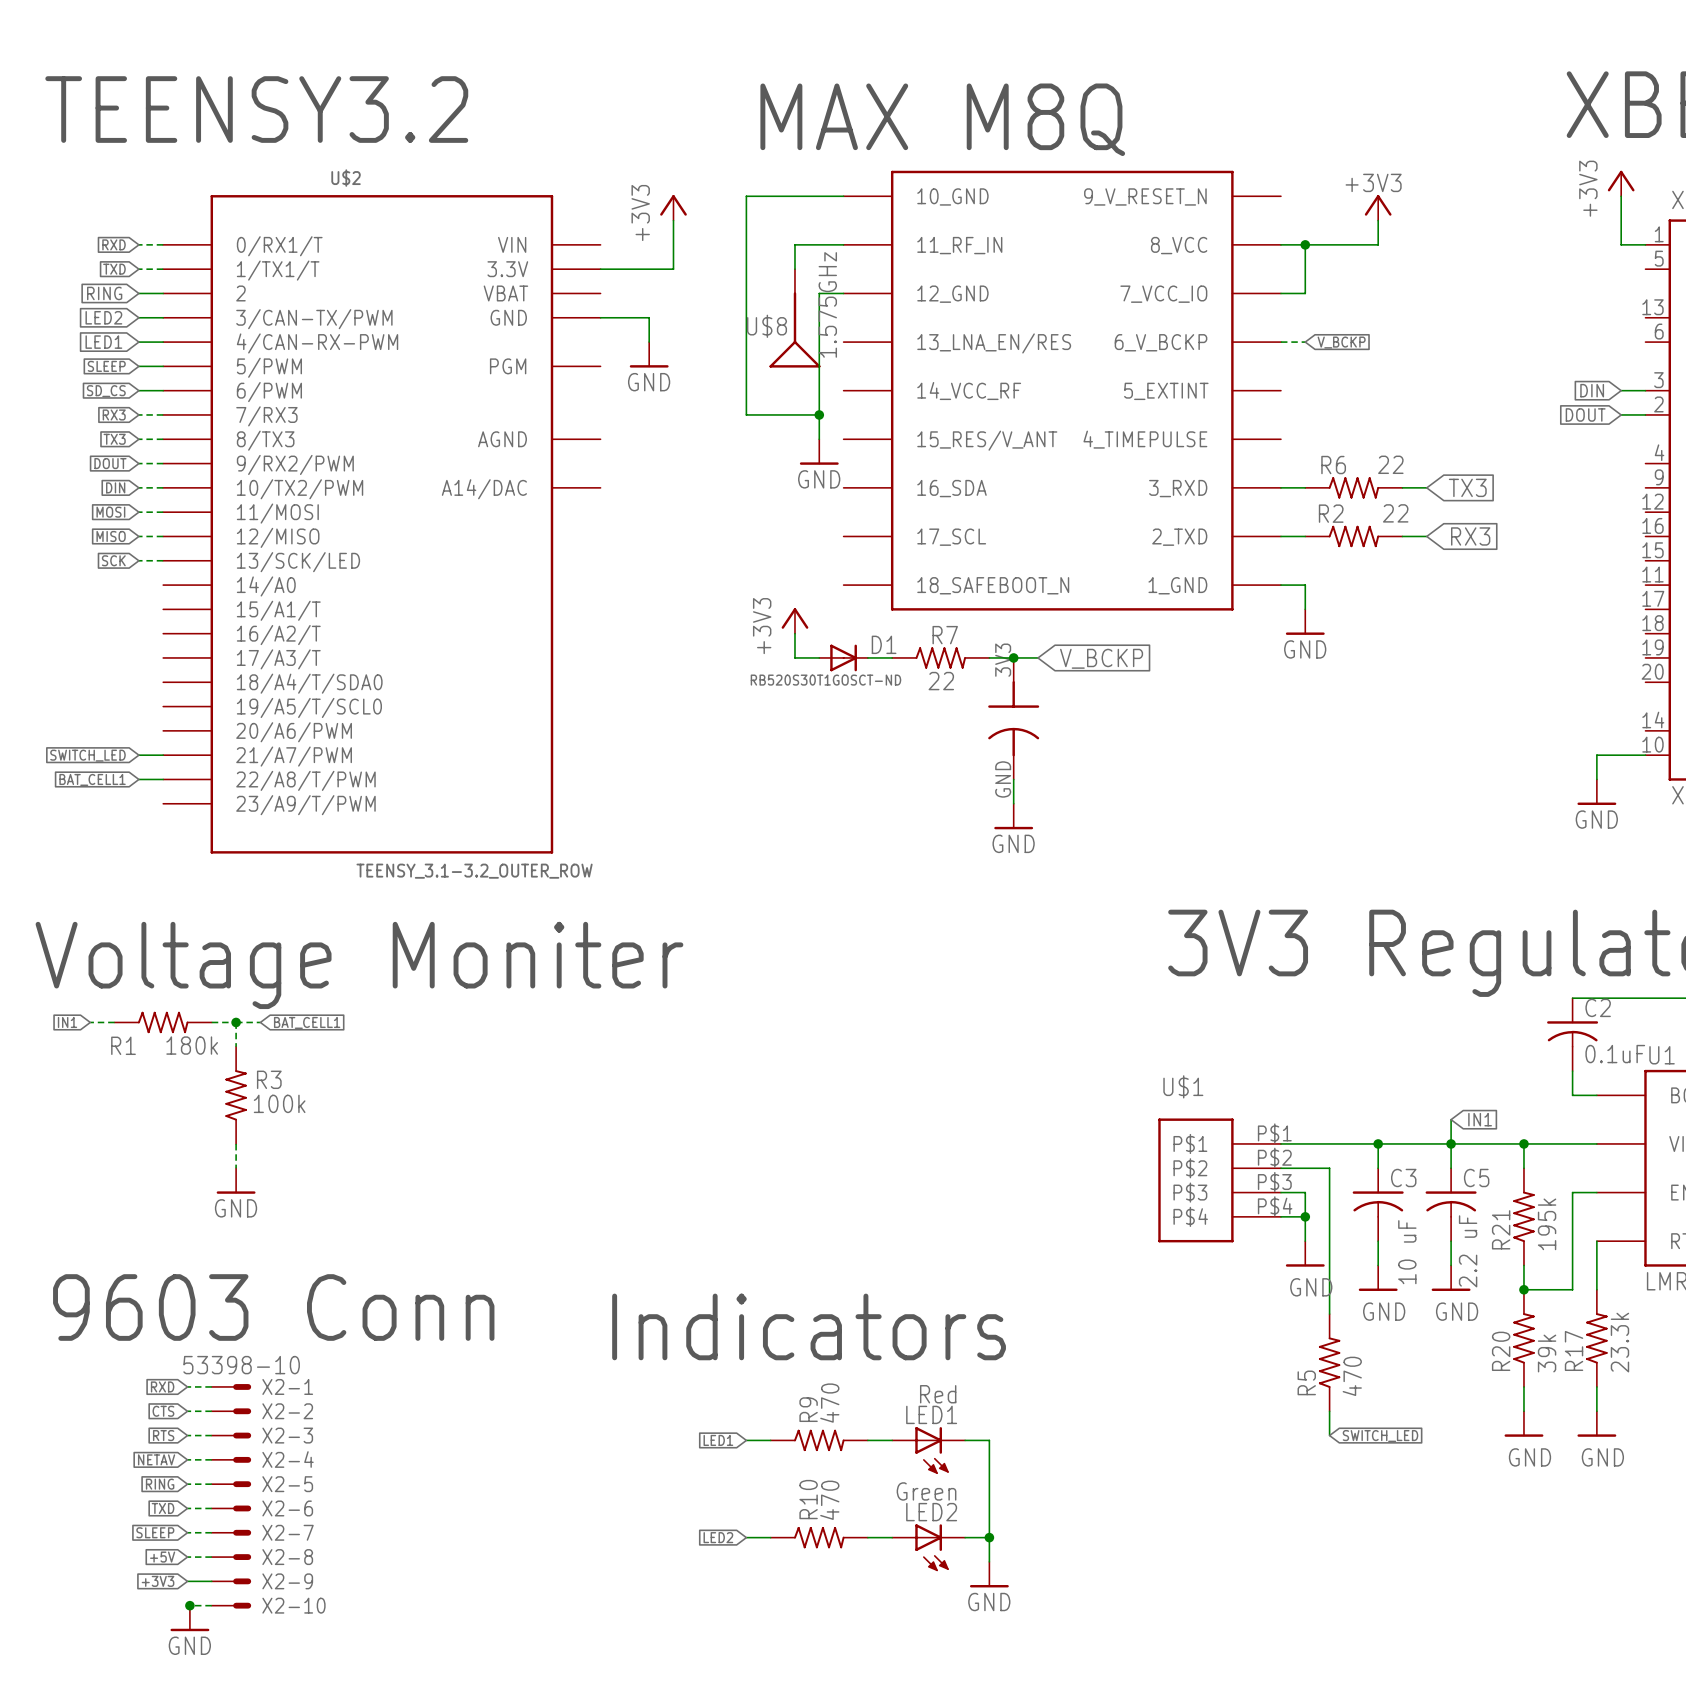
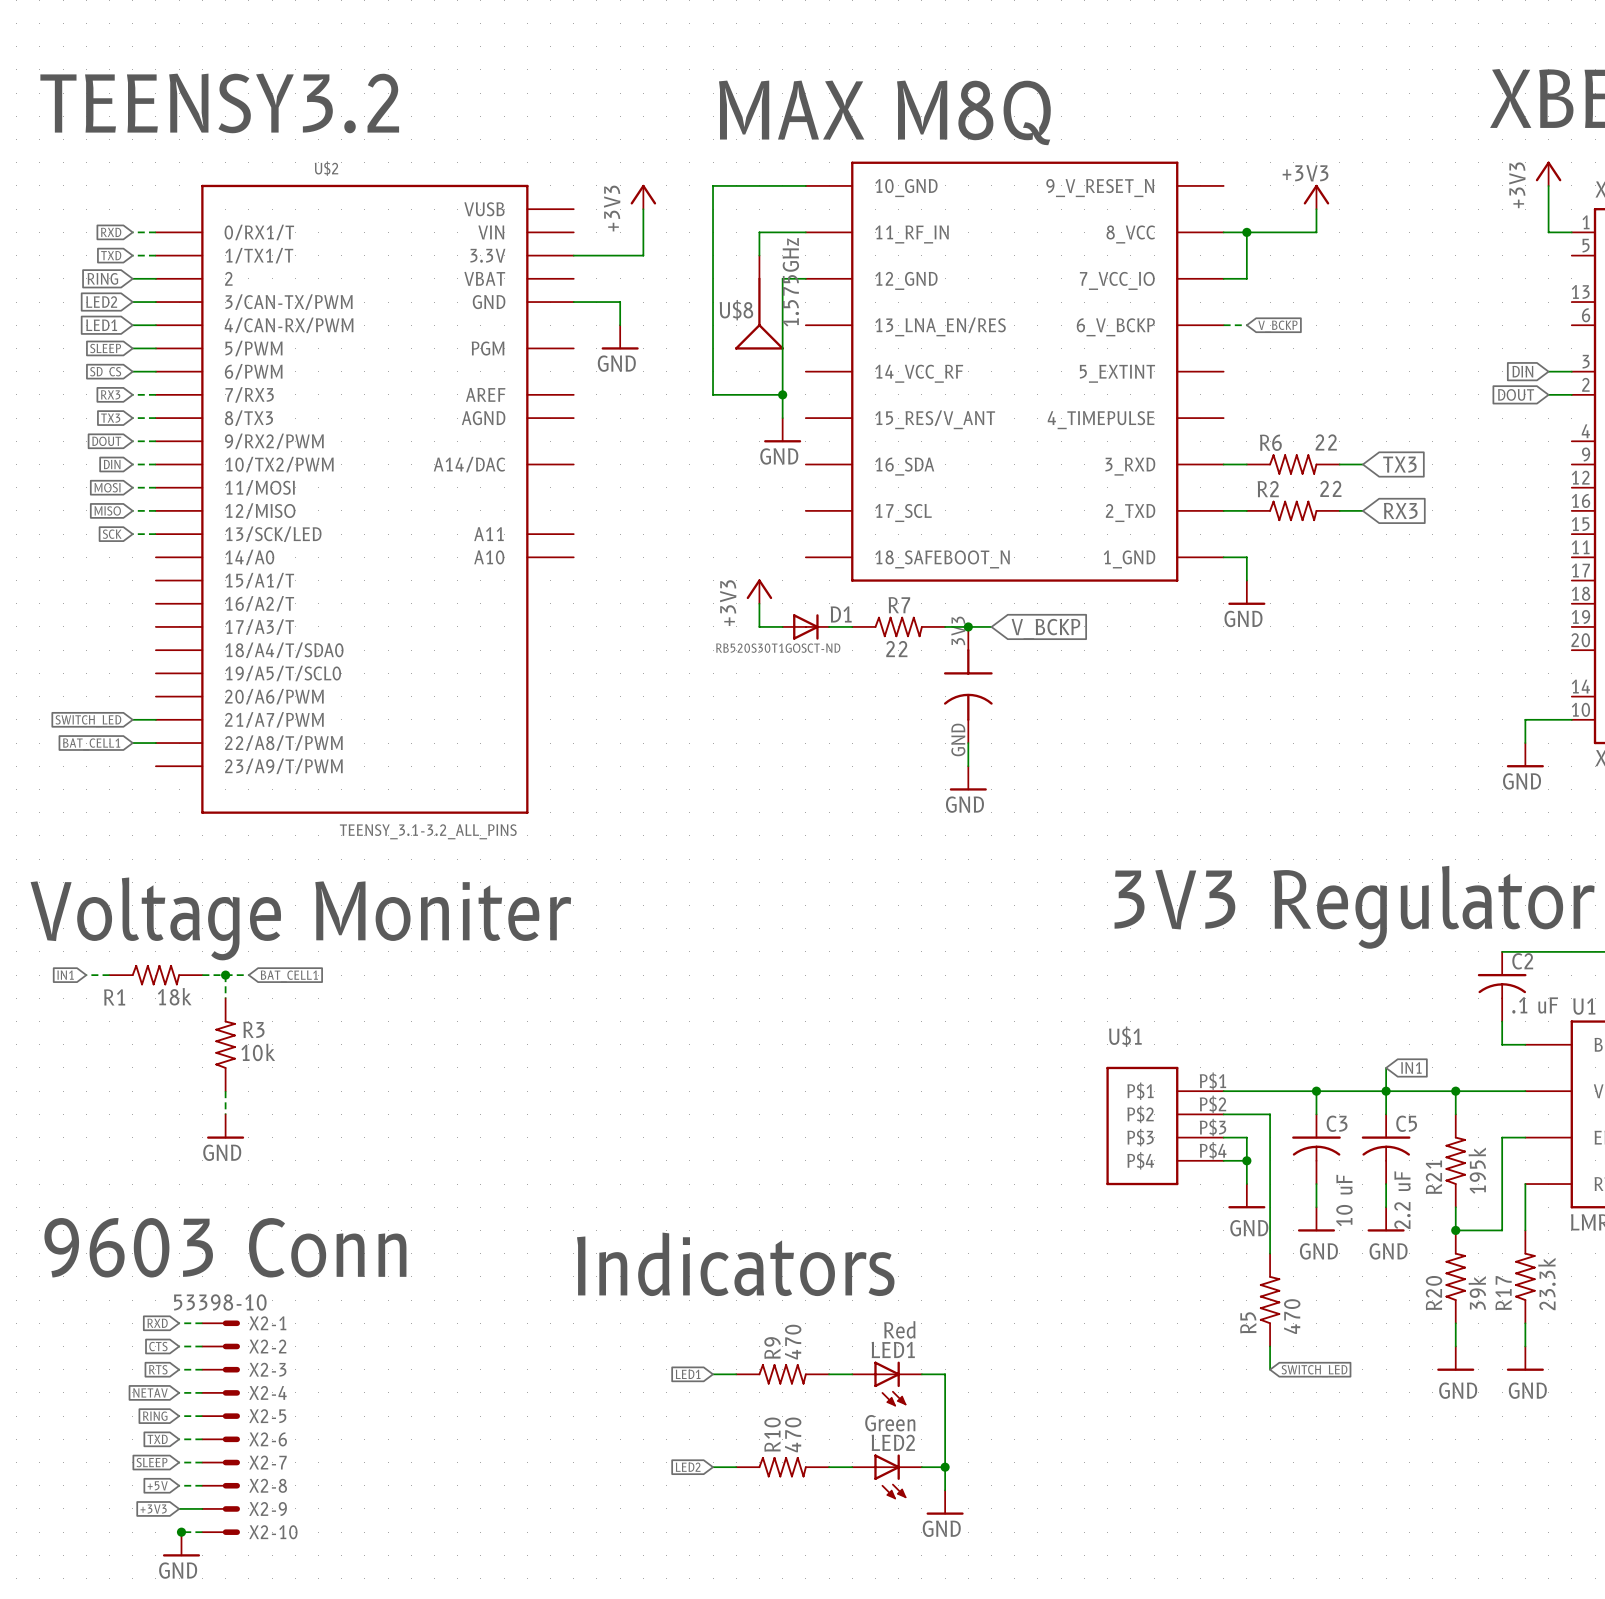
U$2 symbol: [163, 195, 601, 854] -> [155, 184, 574, 814]
U$2 value: TEENSY_3.1-3.2_OUTER_ROW (474, 871) -> TEENSY_3.1-3.2_ALL_PINS (428, 831)
R1 value: 180k (192, 1045) -> 18k (174, 996)
C2 value: 0.1uF (1615, 1054) -> .1 uF (1535, 1005)
R3 value: 100k (279, 1103) -> 10k (258, 1052)

